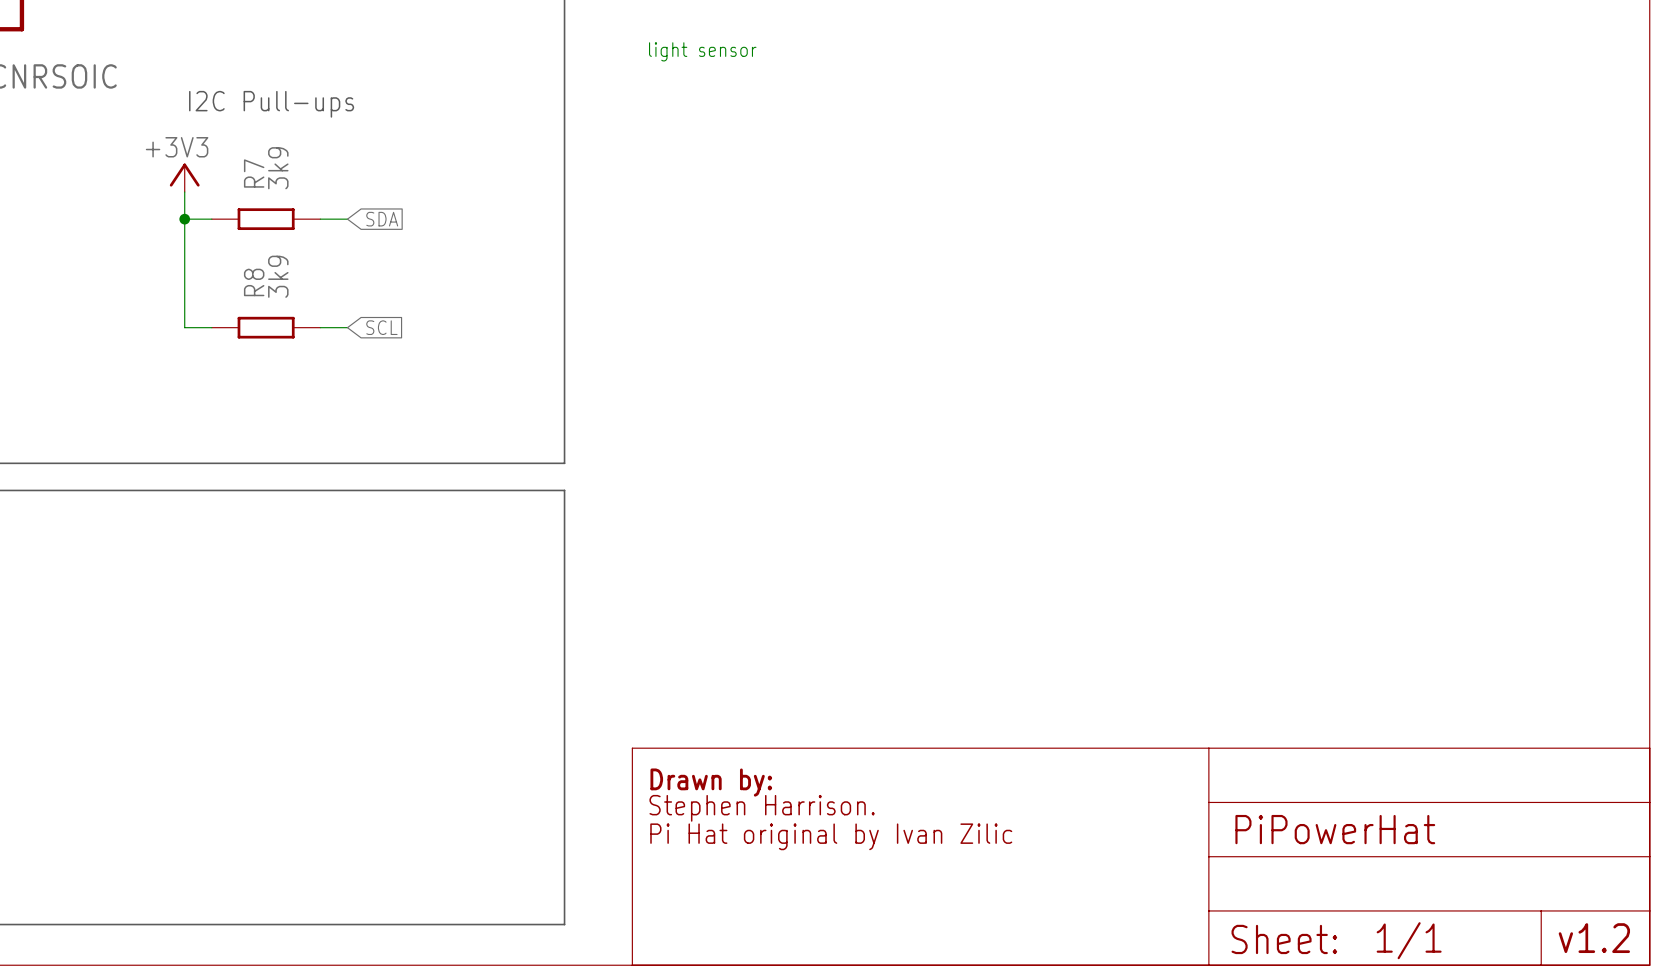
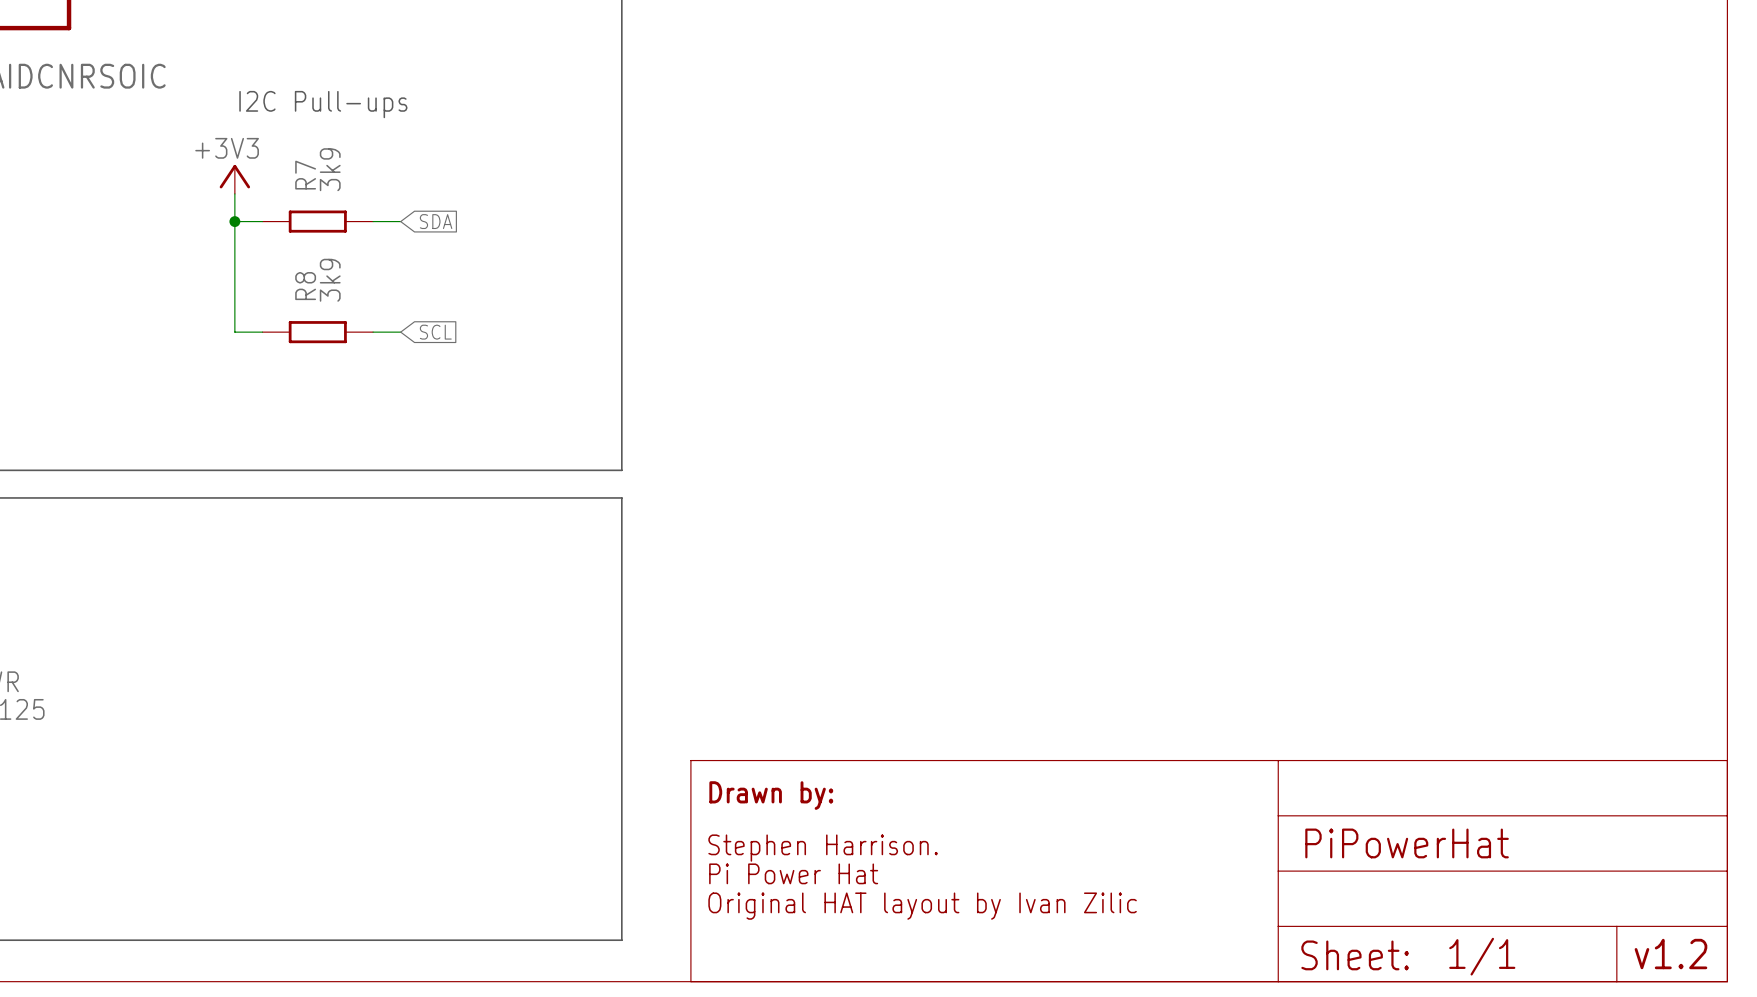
text: light sensor (702, 51) -> none
text: Stephen Harrison. (762, 808) -> none
text: Pi Hat original by Ivan Zilic (831, 836) -> Stephen Harrison. (823, 848)
text: none -> Pi Power Hat (793, 873)
text: none -> Original HAT layout by Ivan Zilic (922, 906)

